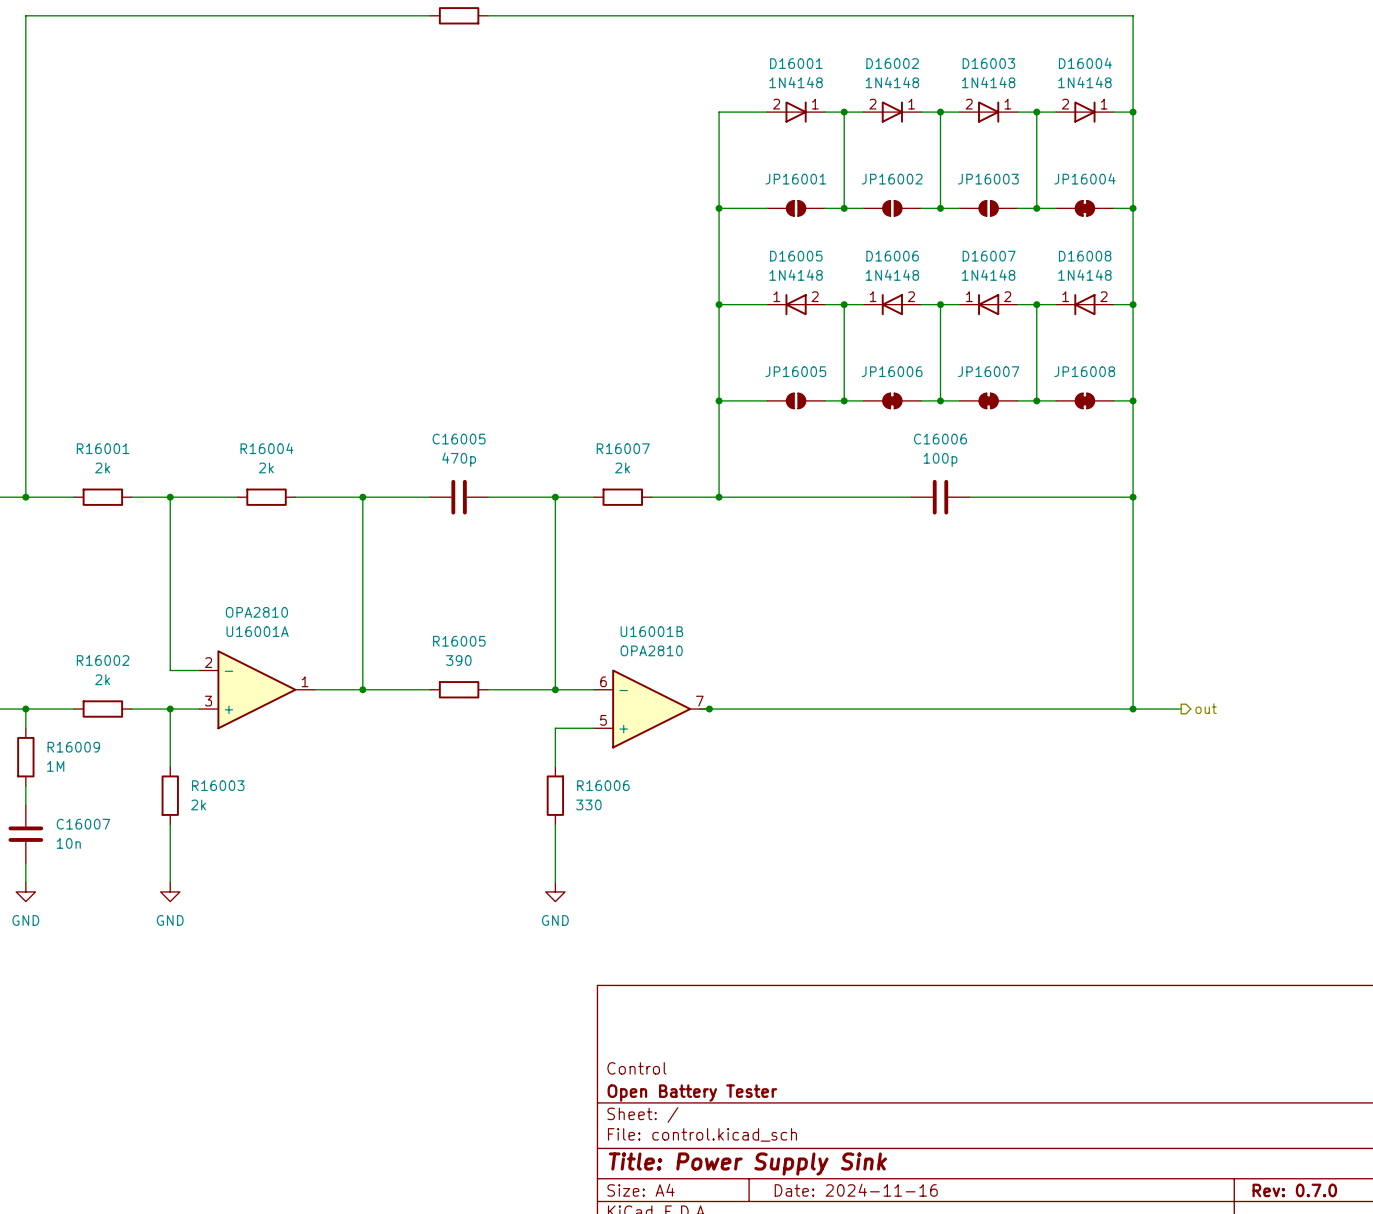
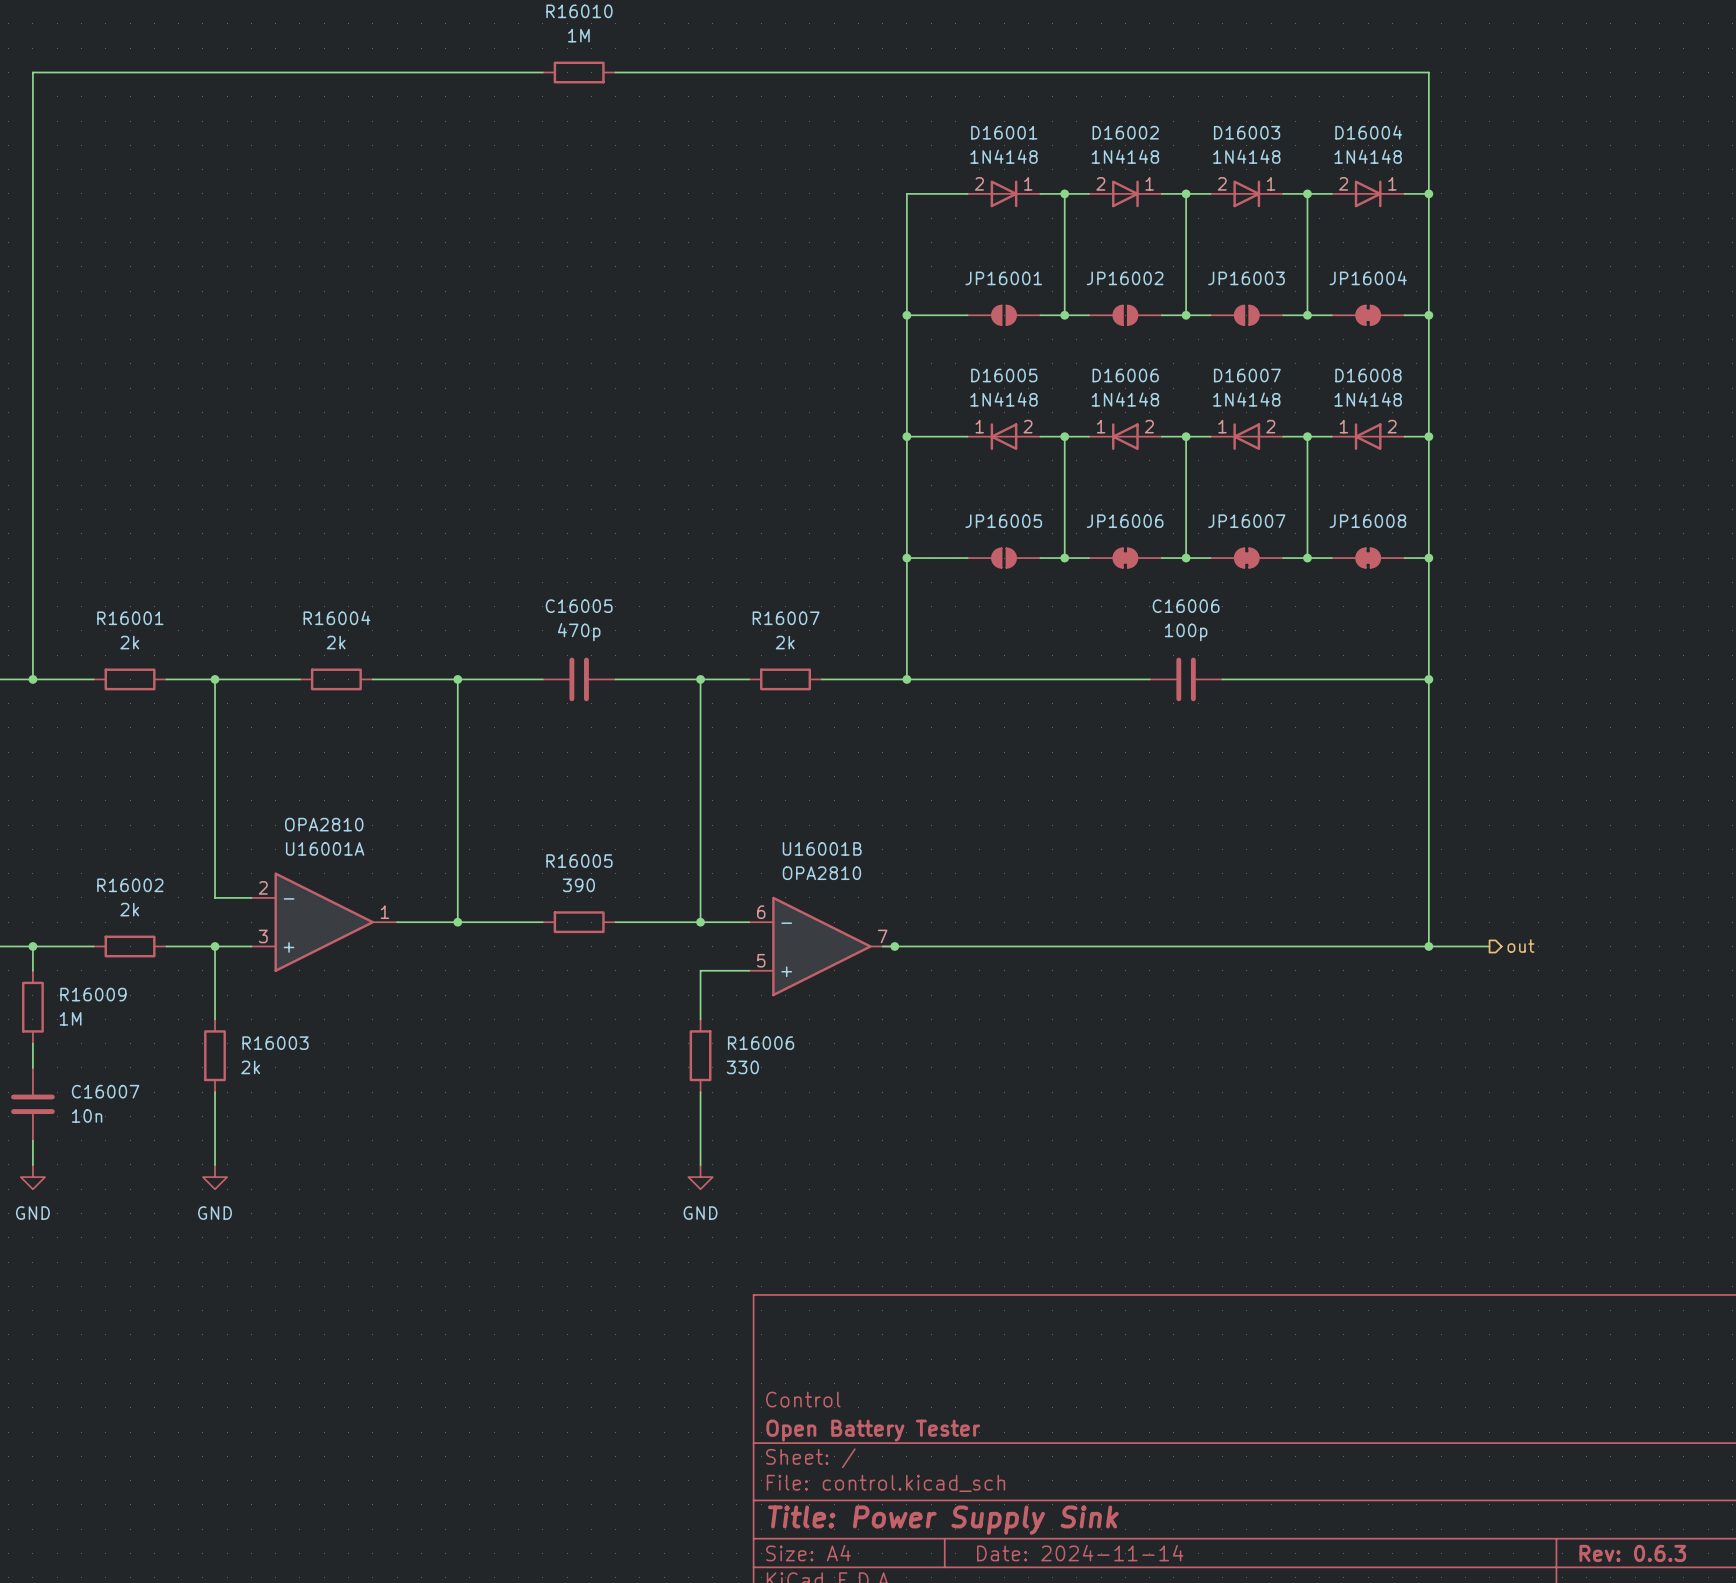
title block: Date: 2024-11-16 (856, 1190) -> Date: 2024-11-14 (1080, 1553)
title block: Rev: 0.7.0 (1294, 1190) -> Rev: 0.6.3 (1632, 1553)

